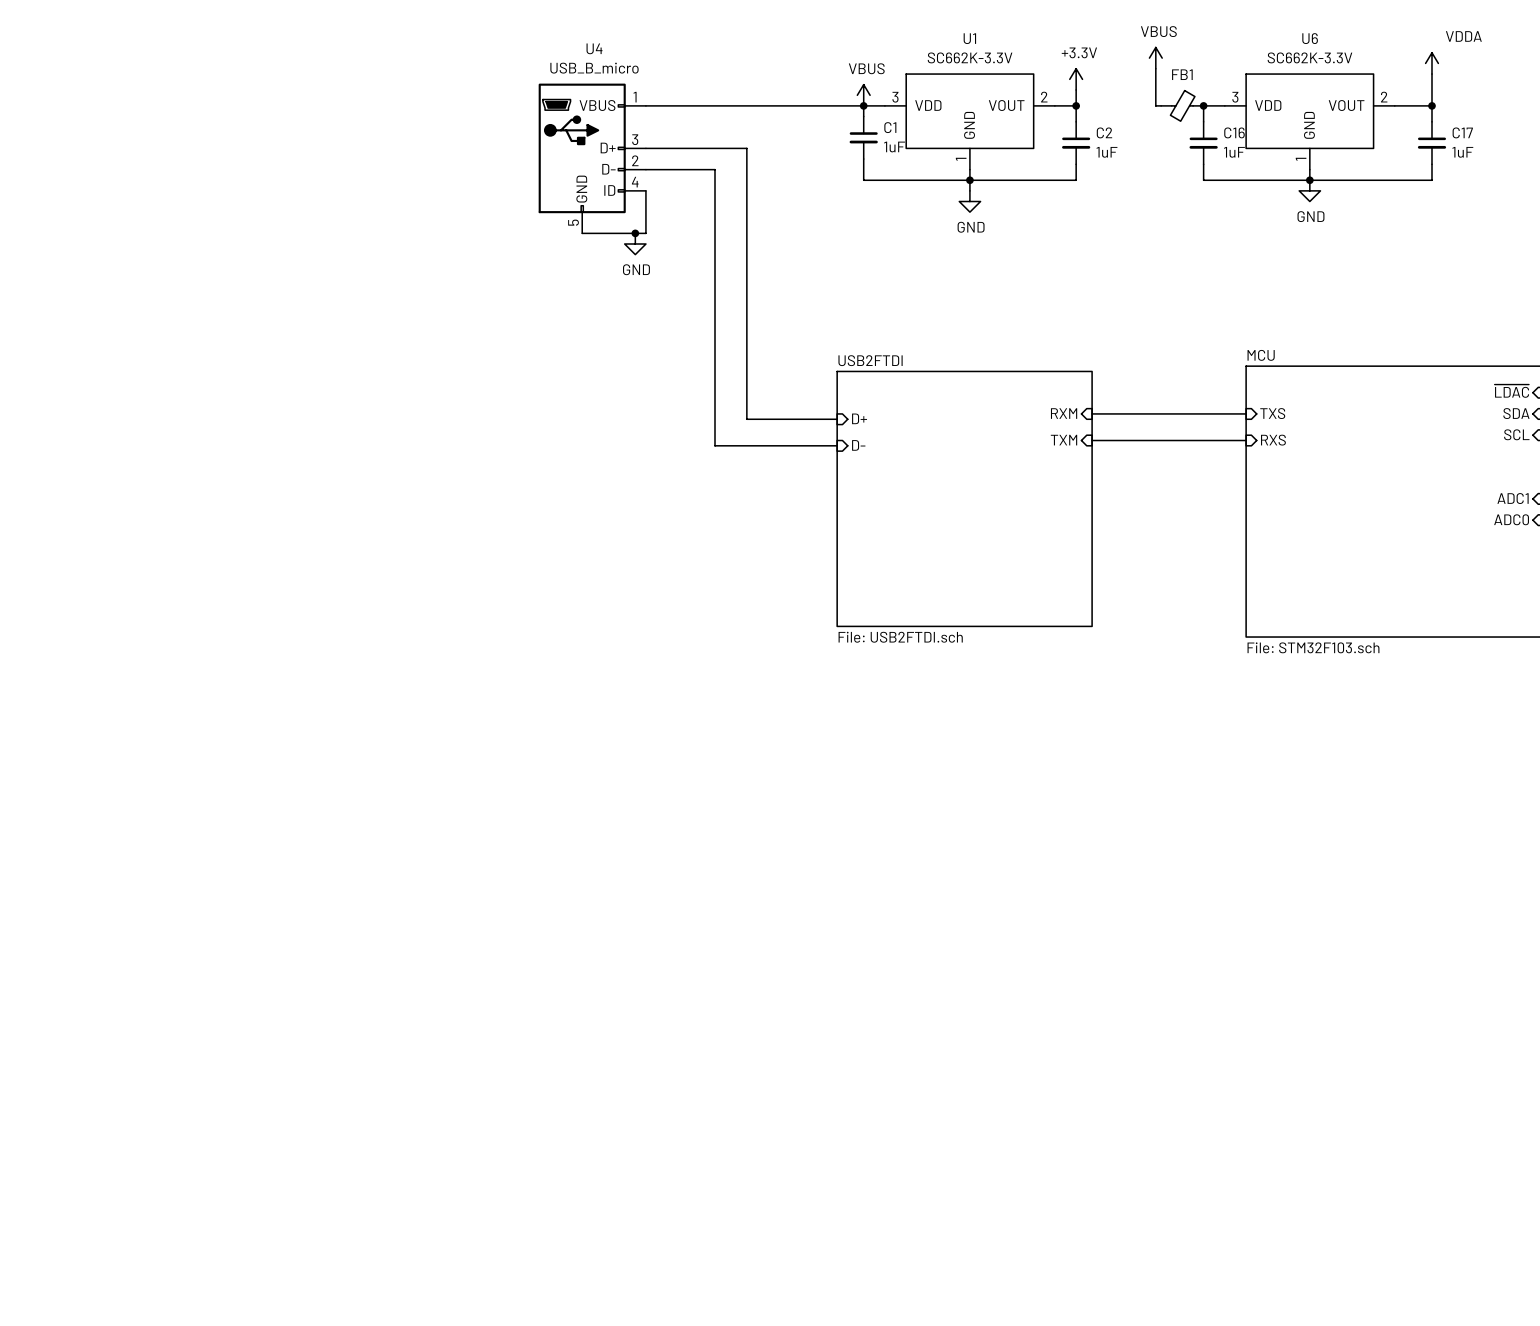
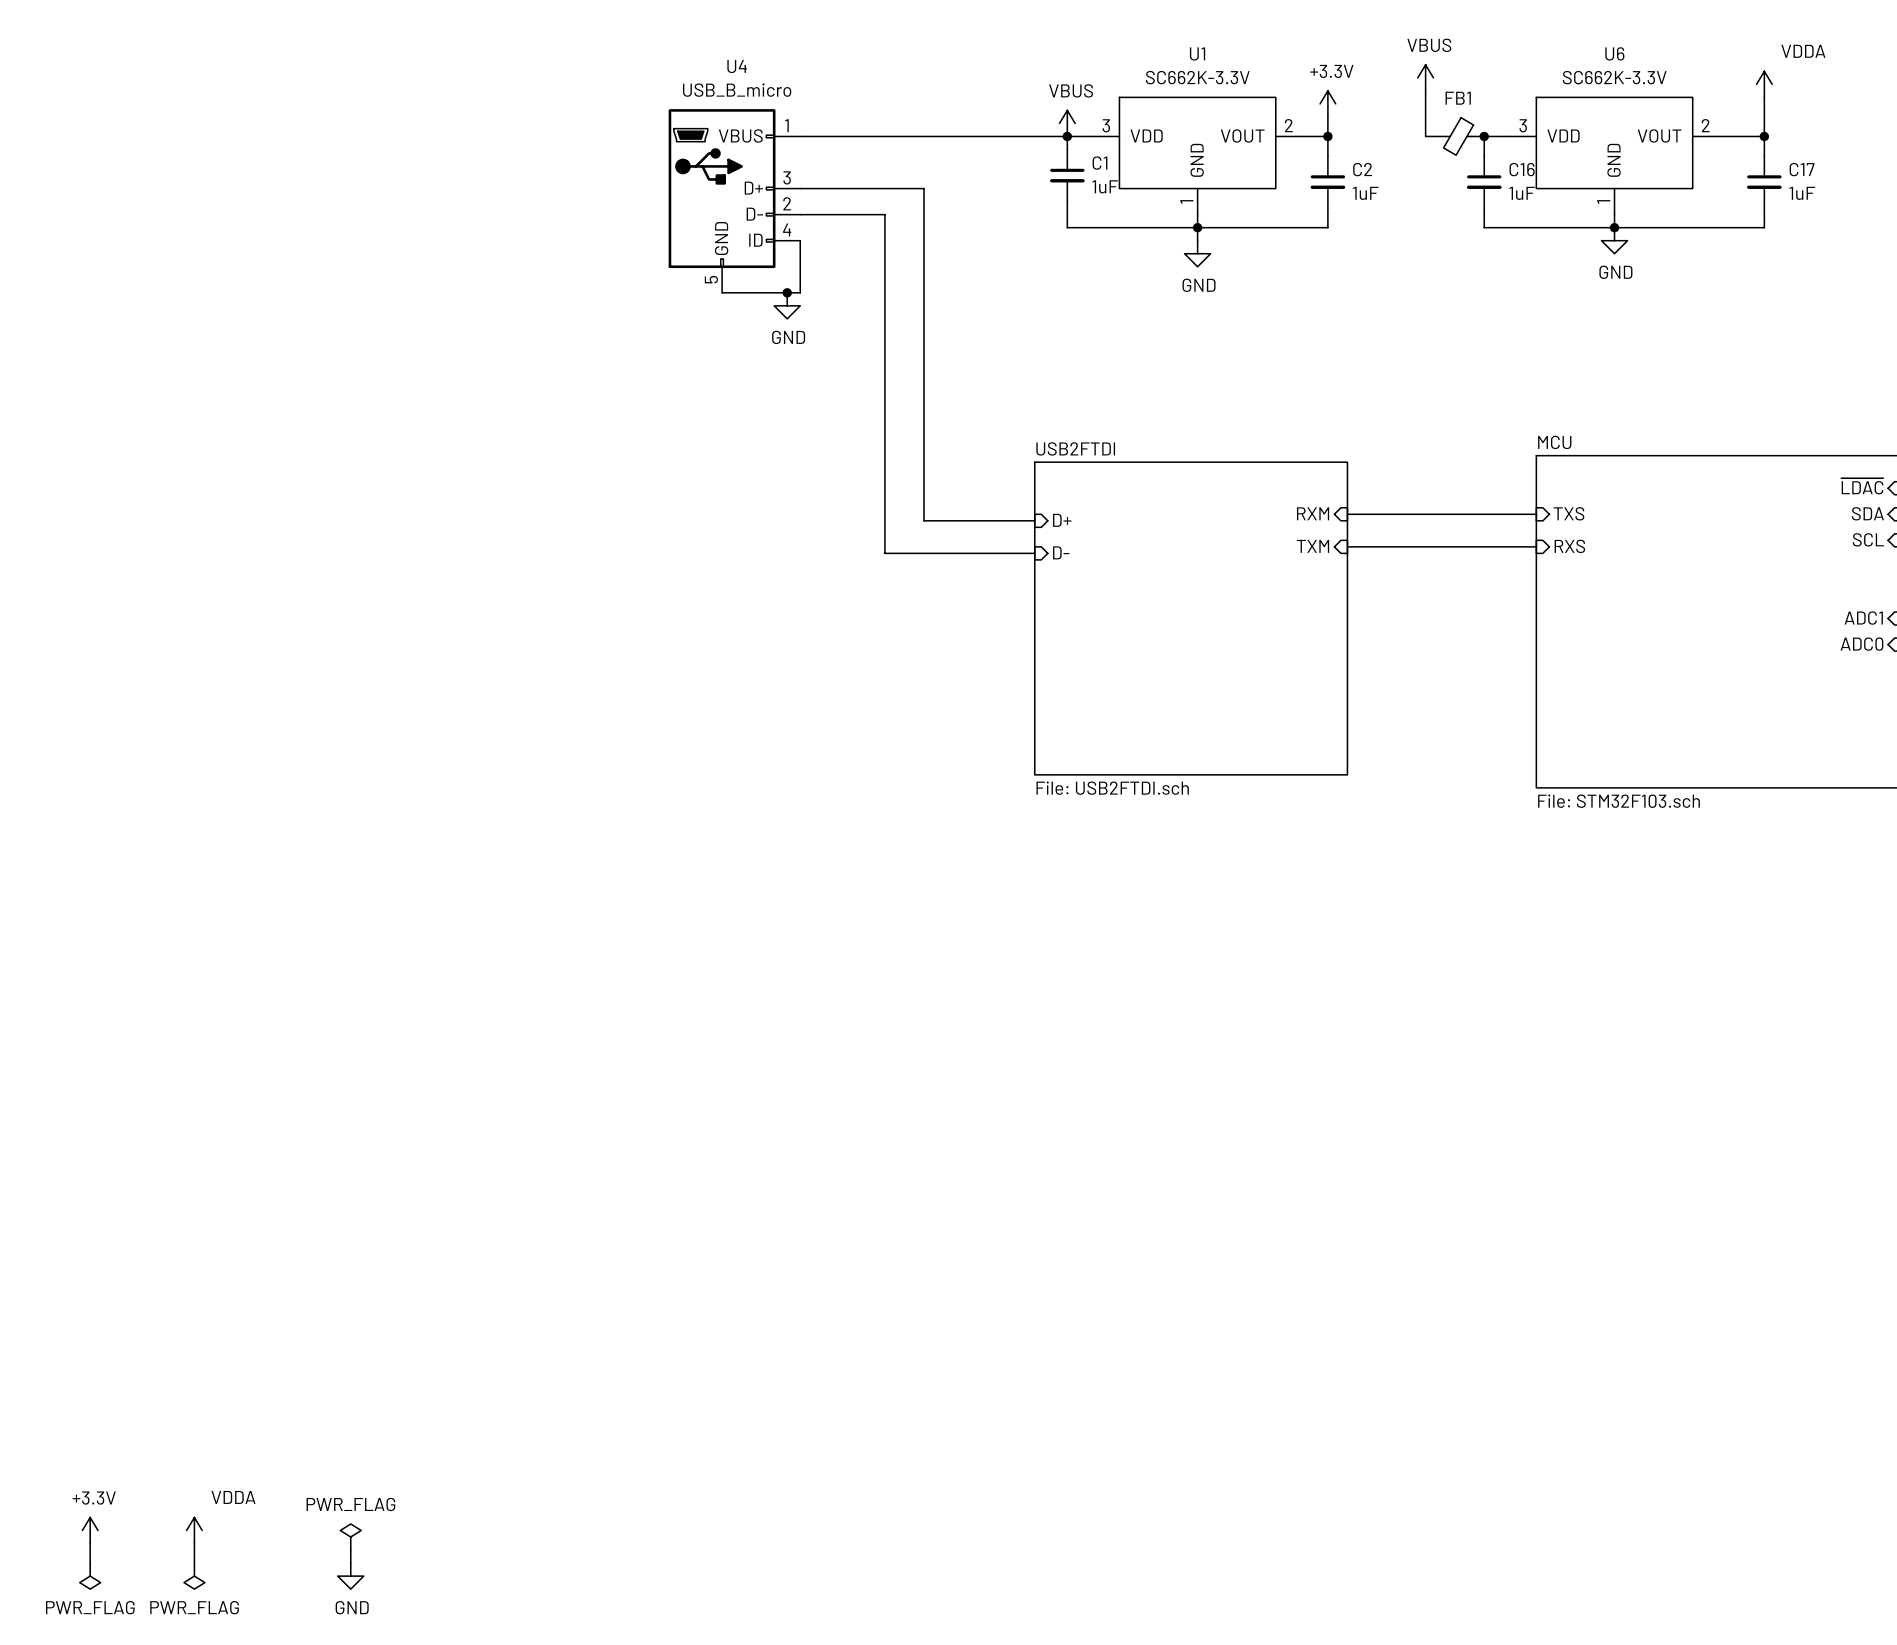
power symbol: none -> +3.3V (90, 1530)
power symbol: none -> VDDA (194, 1530)
power symbol: none -> PWR_FLAG (350, 1537)
wire: none -> (90, 1543) (90, 1563)
wire: none -> (194, 1543) (194, 1563)
wire: none -> (350, 1550) (350, 1563)
power symbol: none -> PWR_FLAG (90, 1576)
power symbol: none -> PWR_FLAG (194, 1576)
power symbol: none -> GND (350, 1576)

